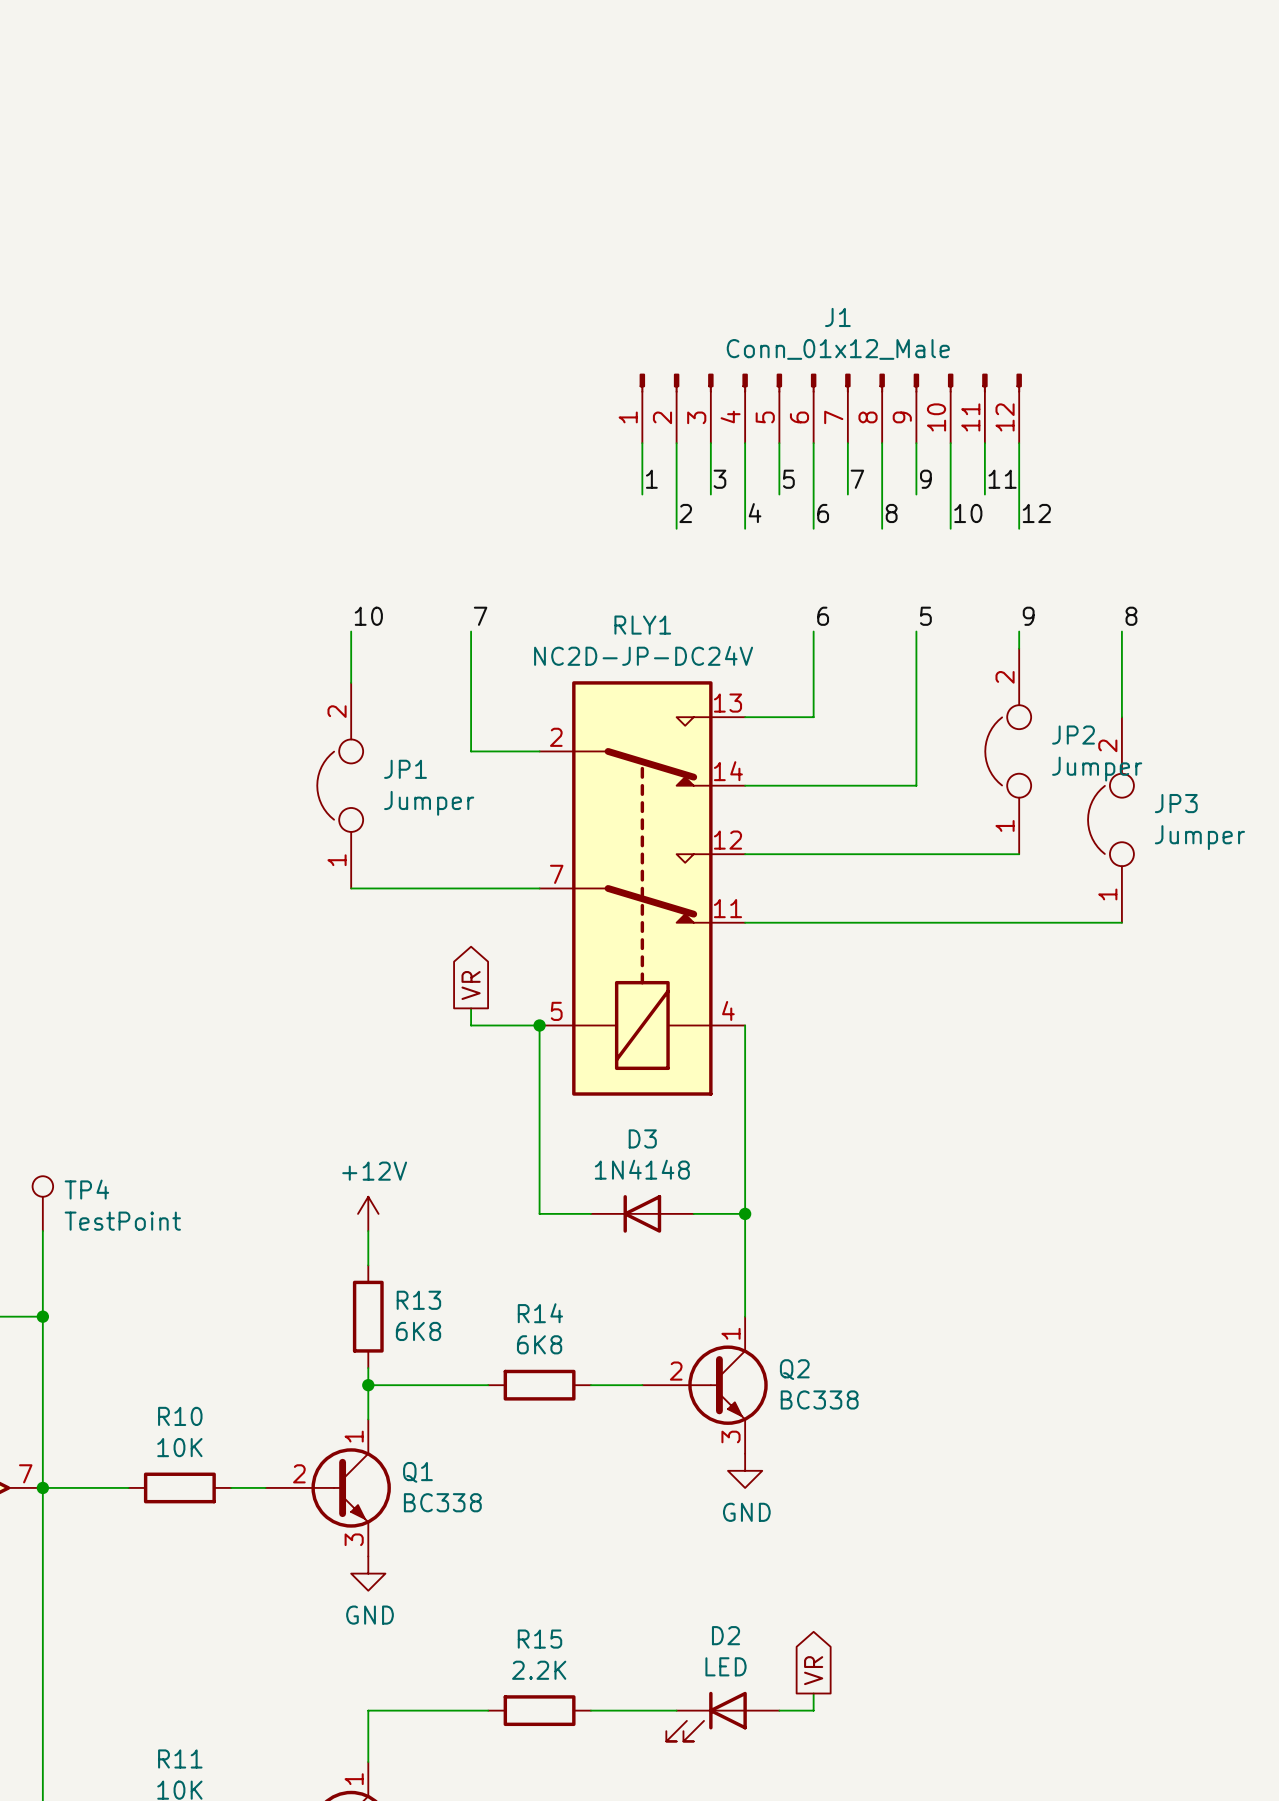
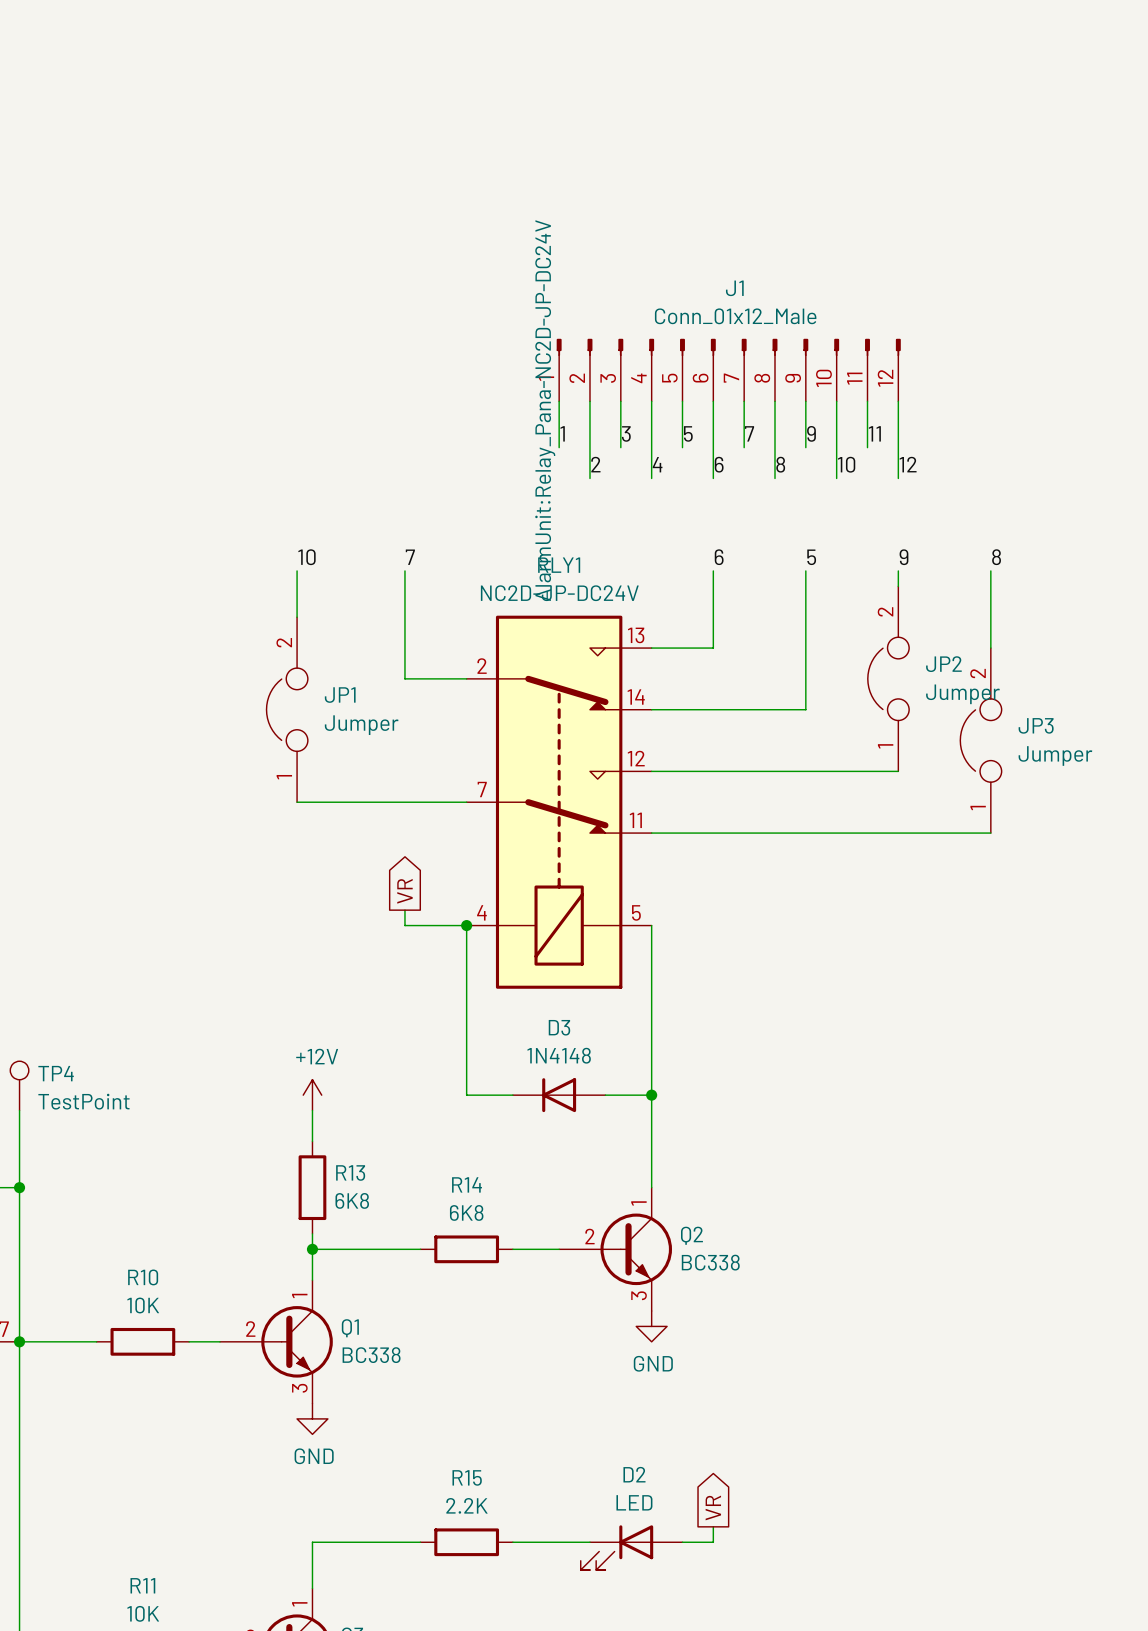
RLY1 text: none -> AlarmUnit:Relay_Pana-NC2D-JP-DC24V (545, 410)
RLY1 pin number: 4 (728, 1010) -> 5 (636, 912)
RLY1 pin number: 5 (556, 1011) -> 4 (481, 912)

